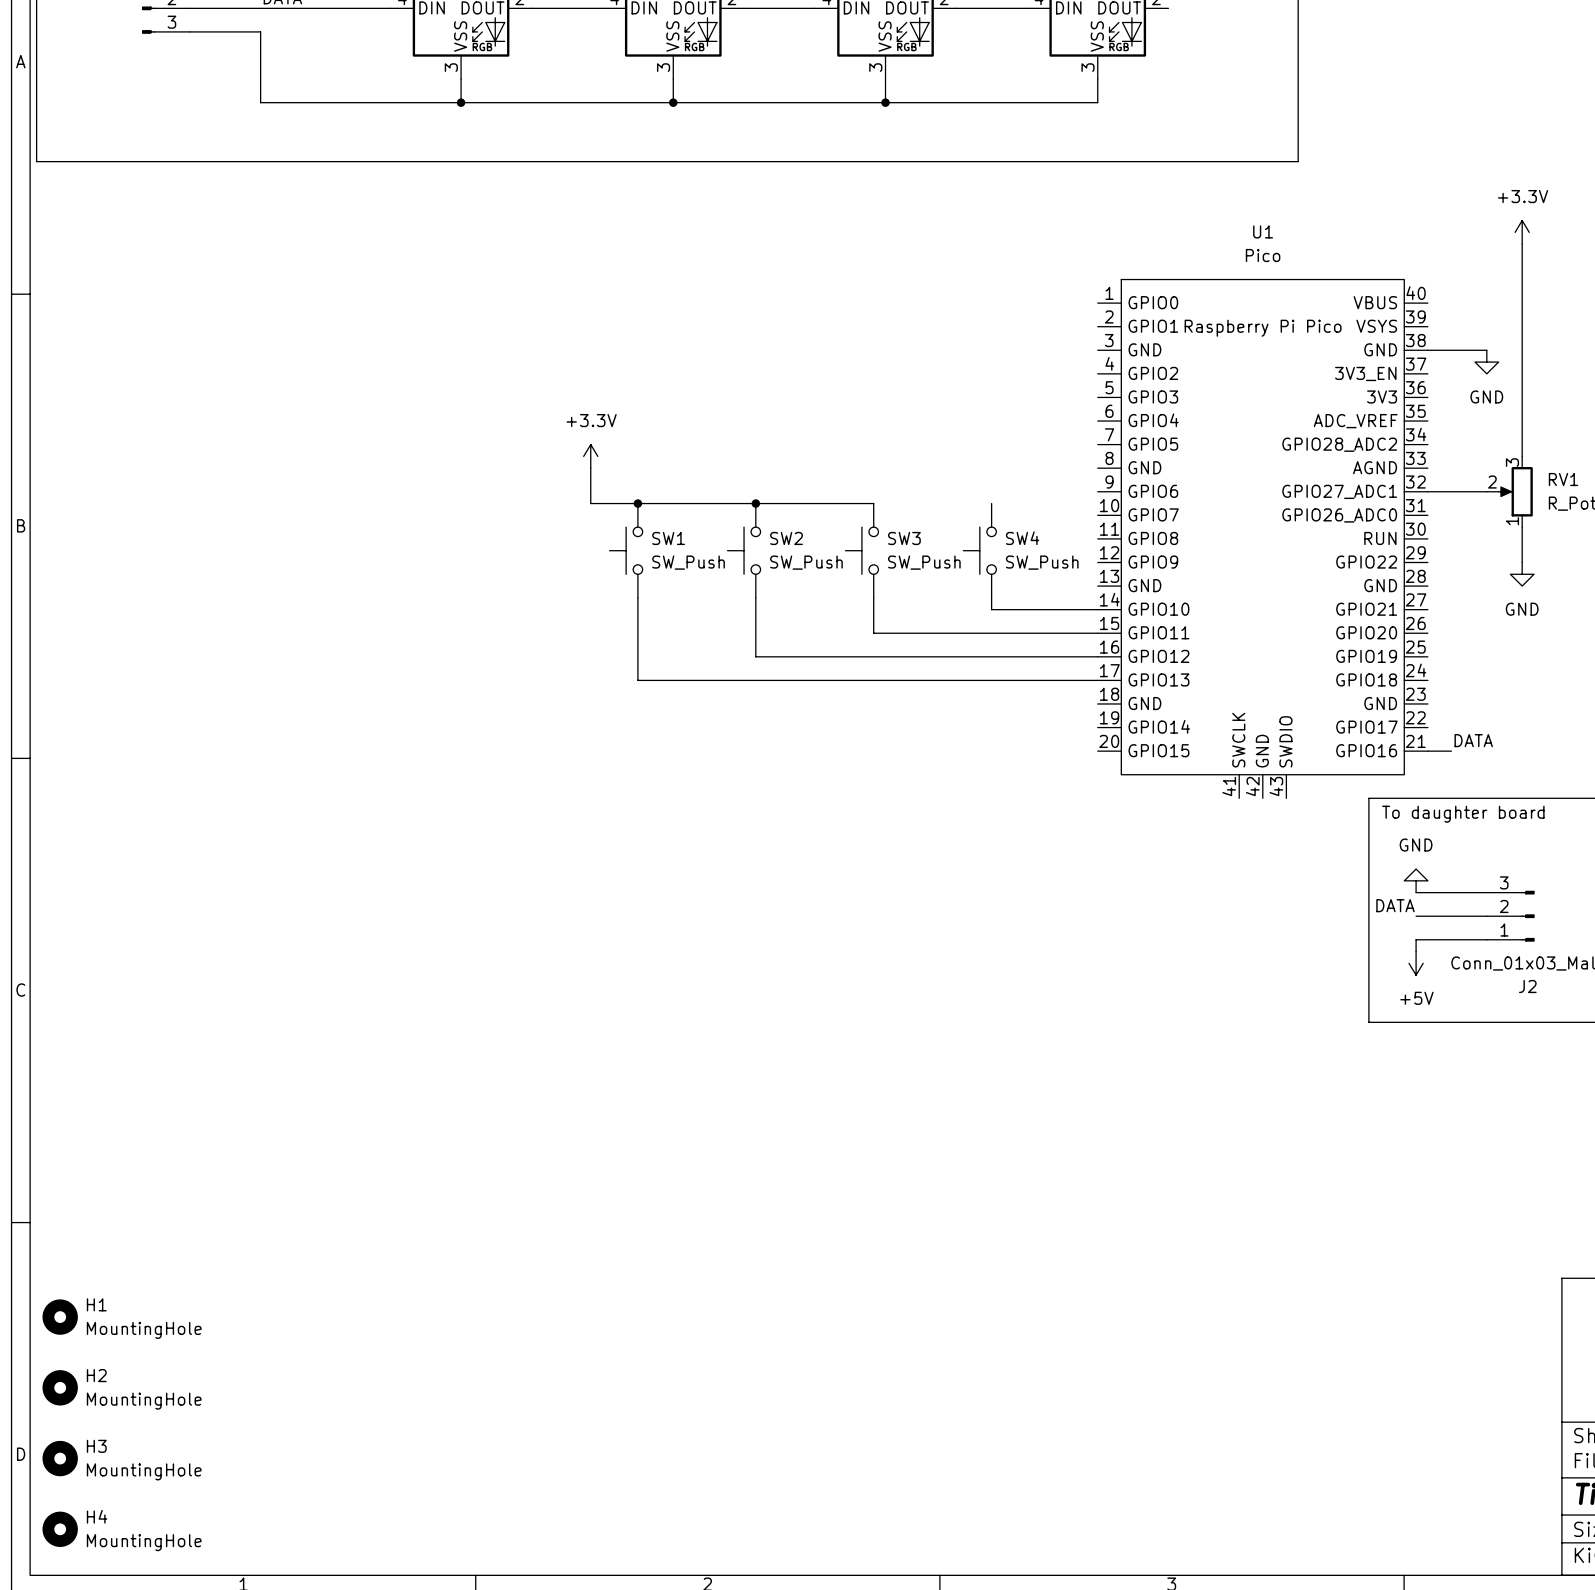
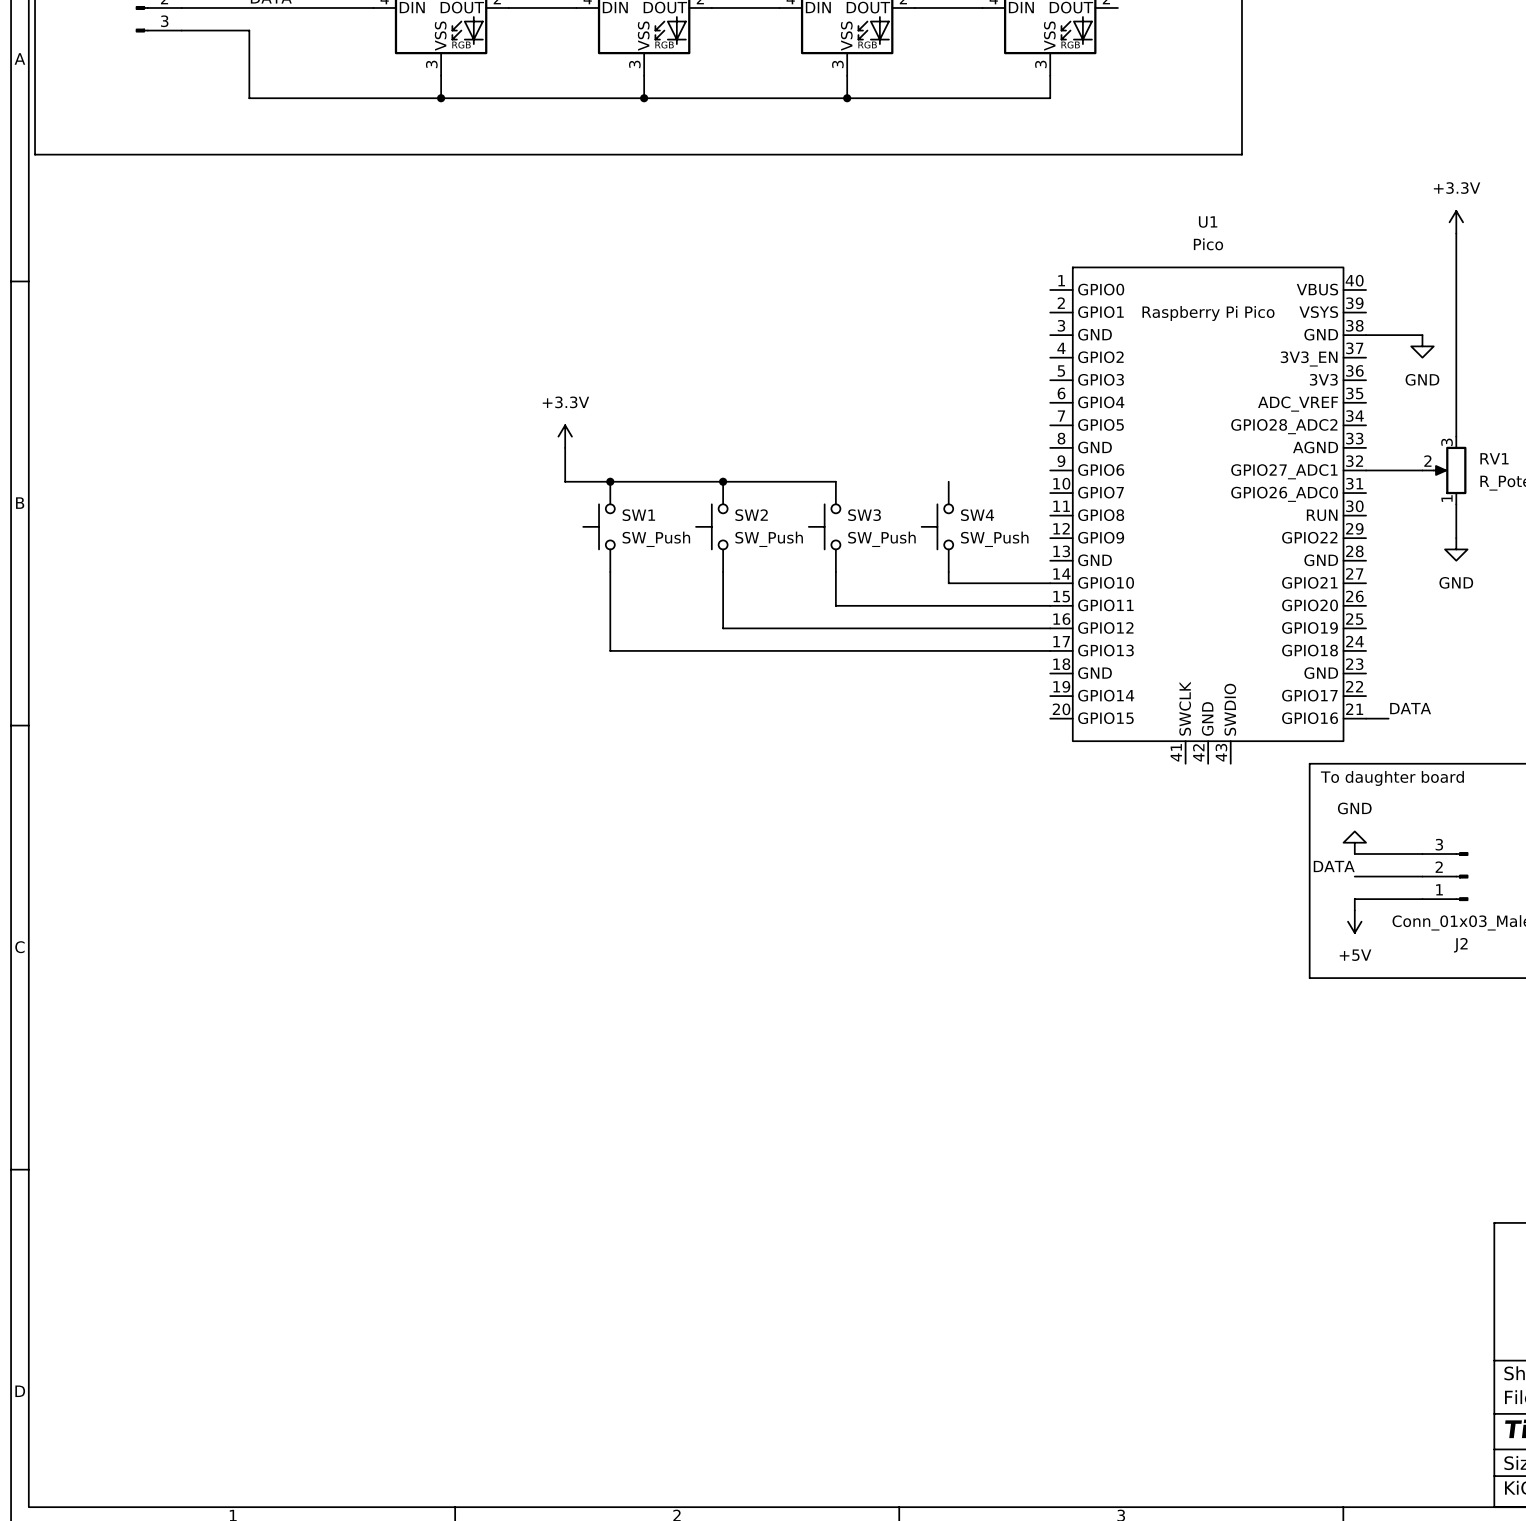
H1: MountingHole (60, 1317) -> none
H2: MountingHole (60, 1387) -> none
H3: MountingHole (60, 1458) -> none
H4: MountingHole (60, 1529) -> none

